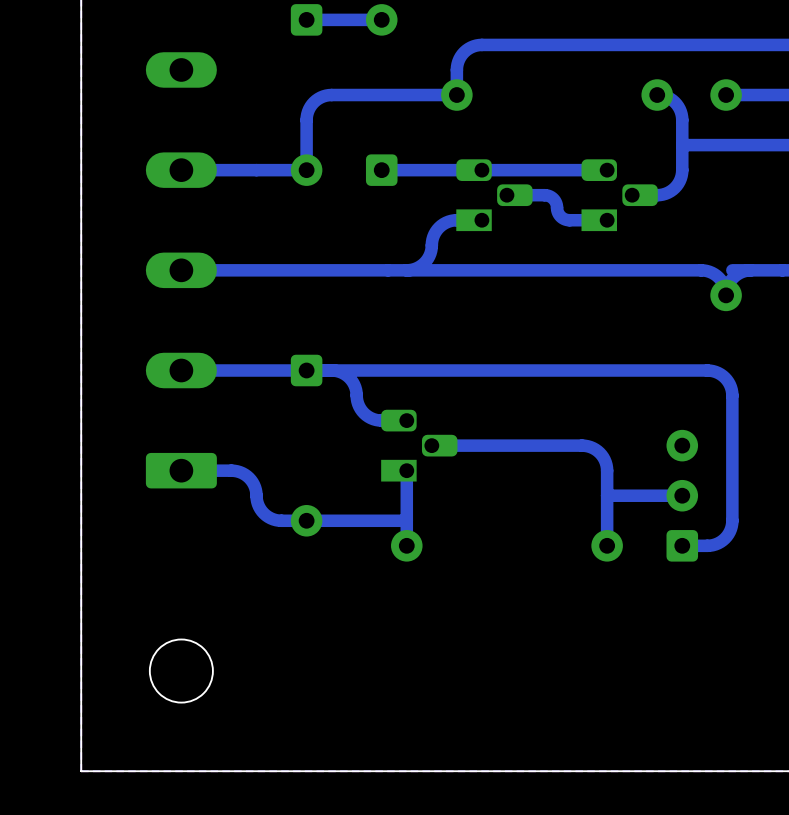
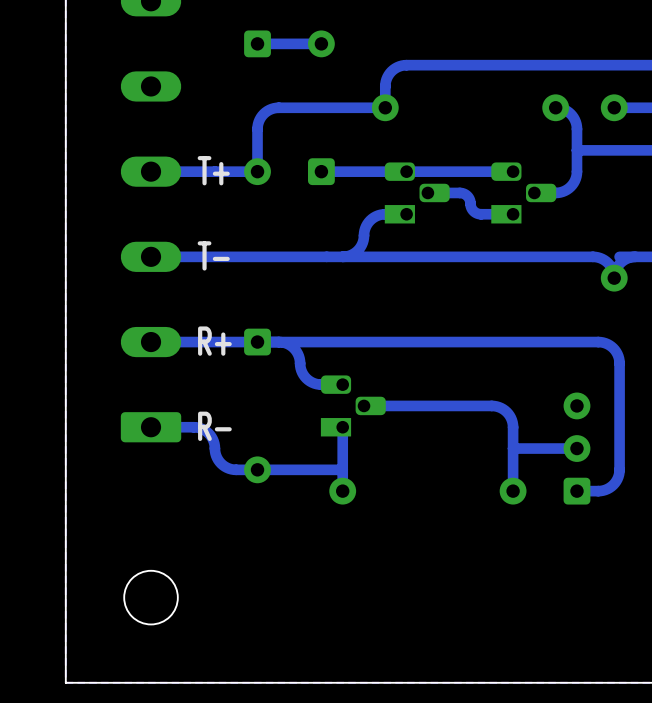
text: none -> T+ (213, 170)
text: none -> T- (213, 255)
text: none -> R+ (214, 341)
text: none -> R- (214, 426)

